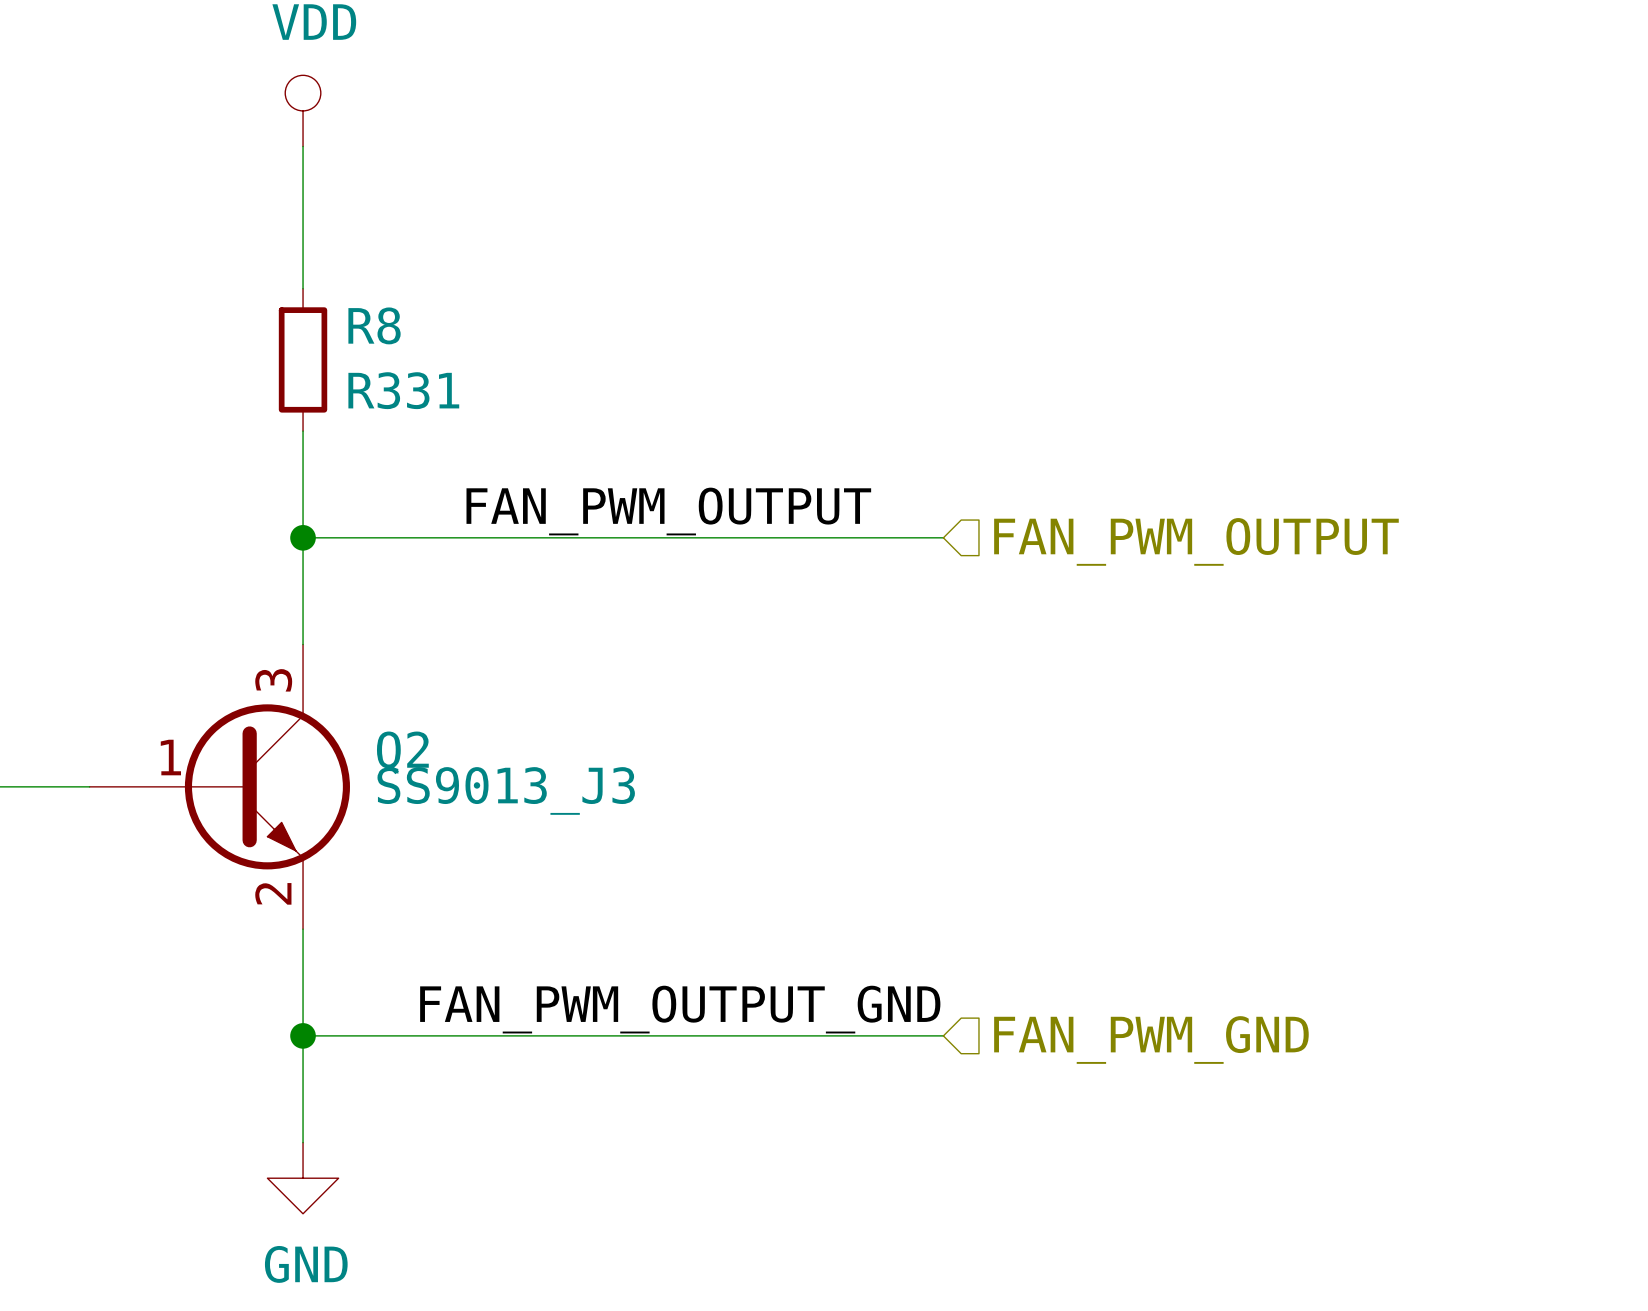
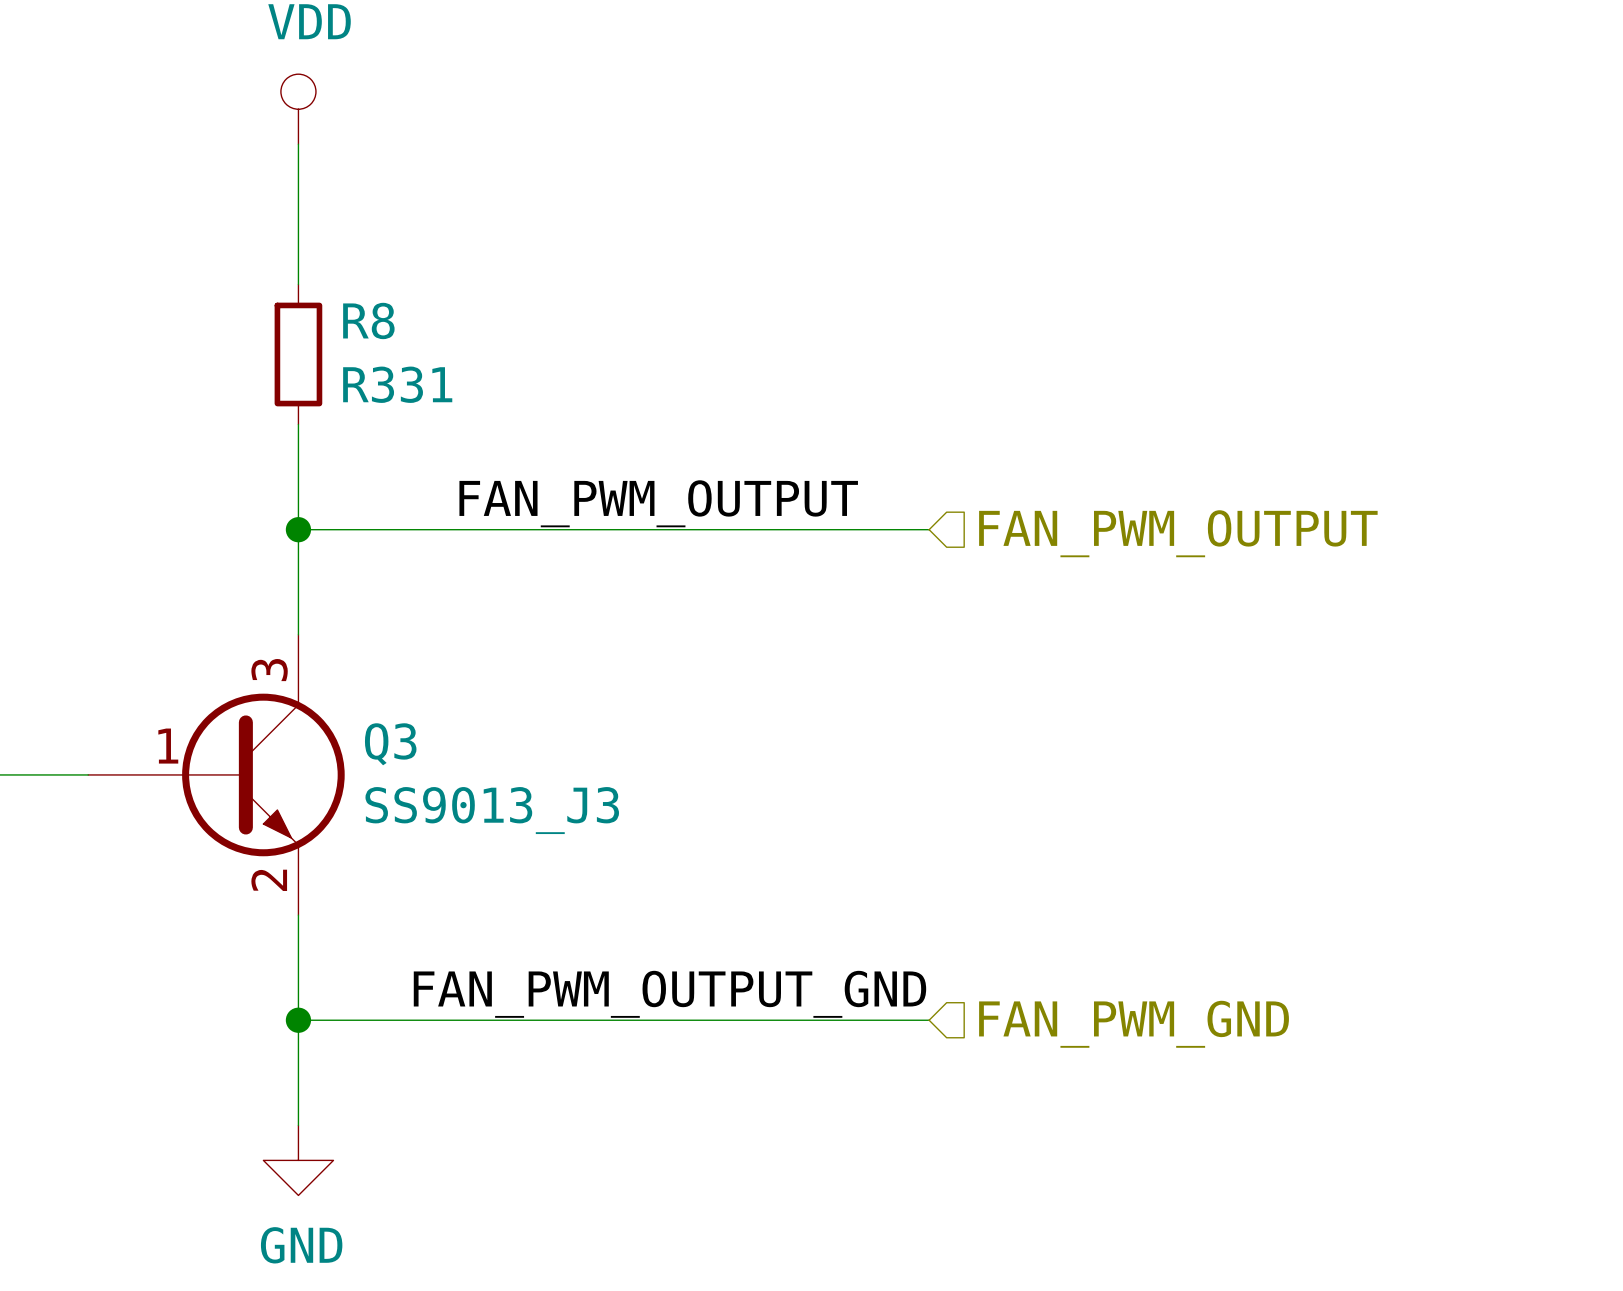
Q2 name: Q2 (402, 752) -> Q3 (390, 744)
Q2 value position: SS9013_J3 (506, 790) -> SS9013_J3 (492, 810)

